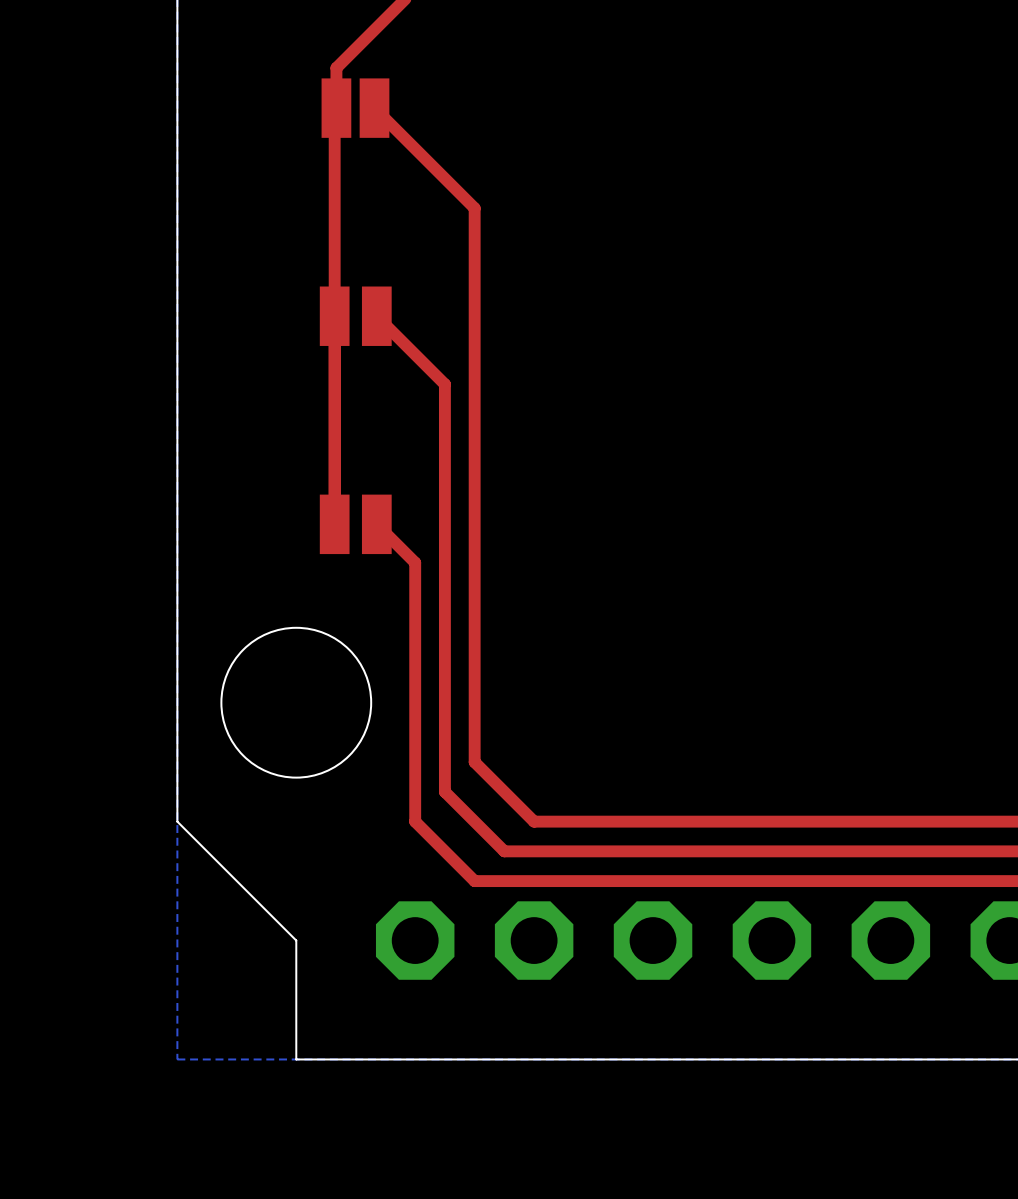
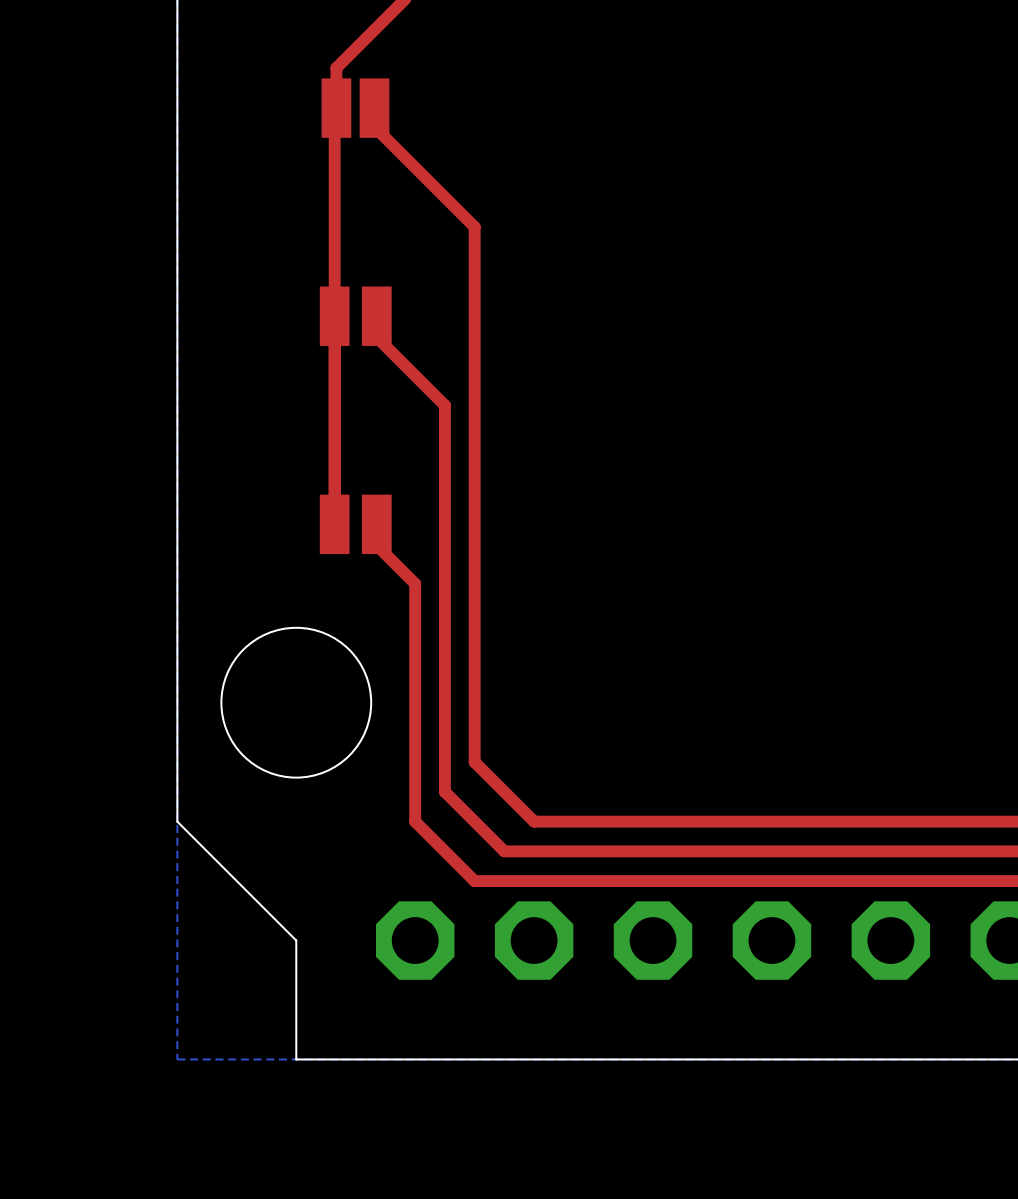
top track: (374, 108) (474, 208) (474, 227) -> (374, 108) (374, 126) (474, 227)
top track: (376, 316) (444, 384) (444, 405) -> (376, 316) (376, 337) (444, 405)
top track: (376, 524) (415, 562) (415, 583) -> (376, 524) (376, 545) (415, 583)

